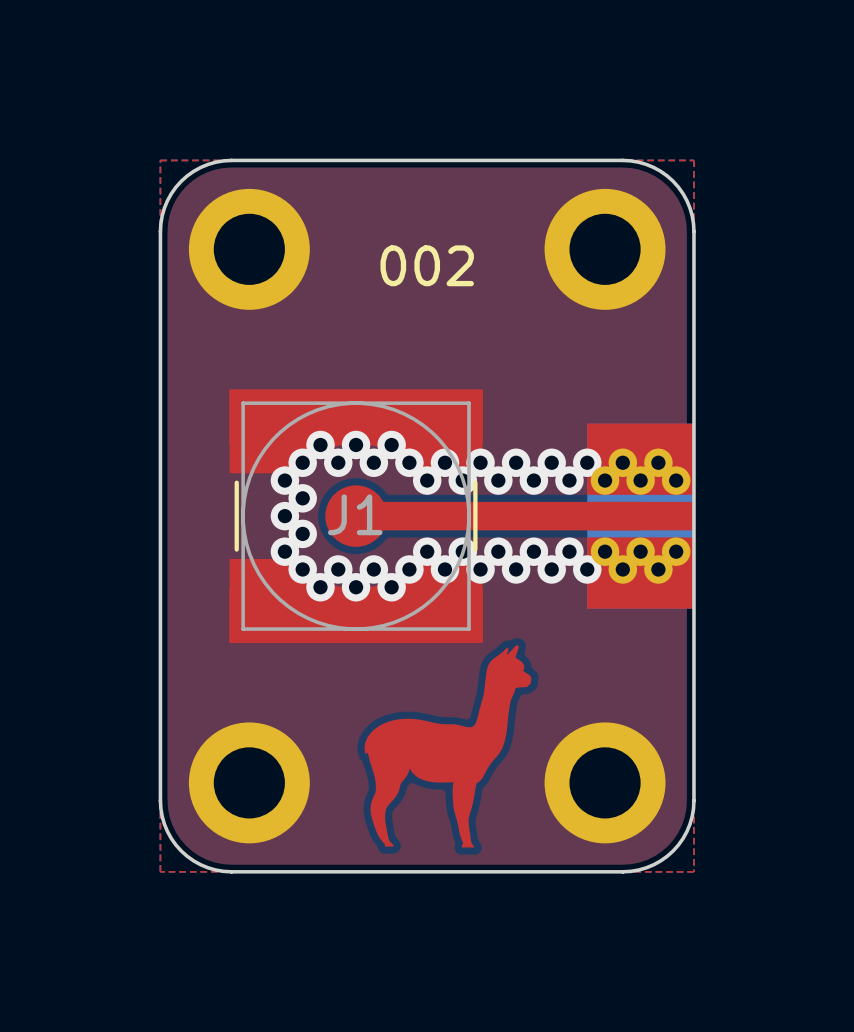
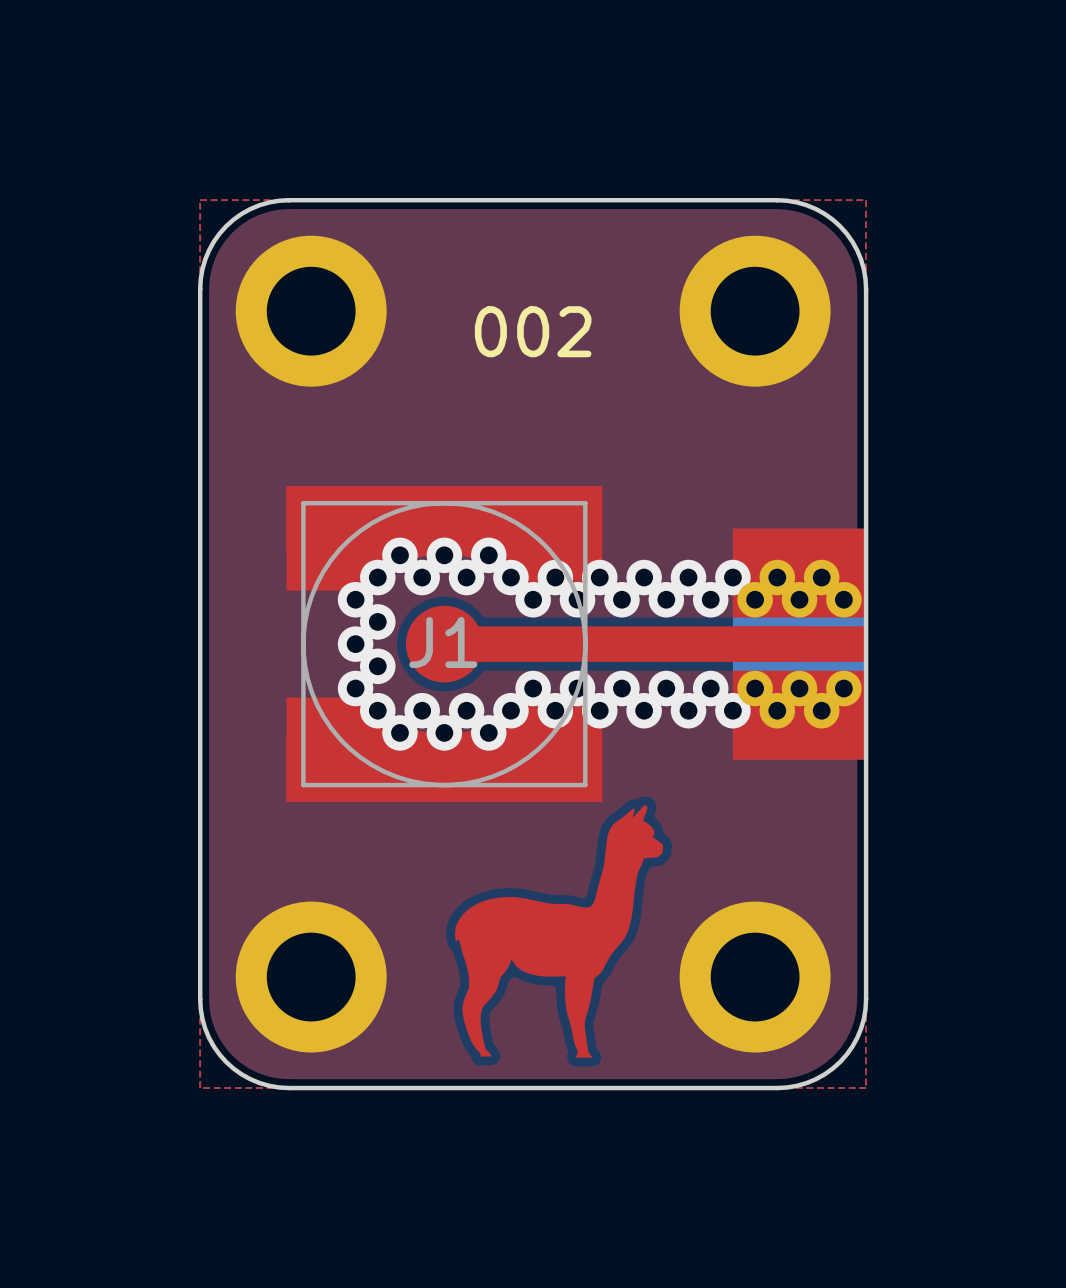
J1 footprint: [229, 389, 483, 643] -> [286, 486, 603, 802]

